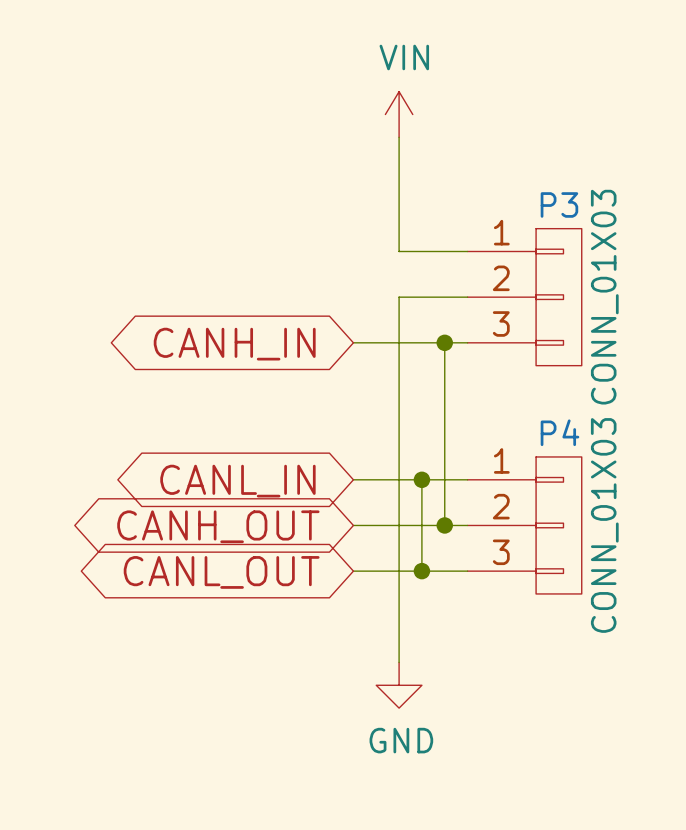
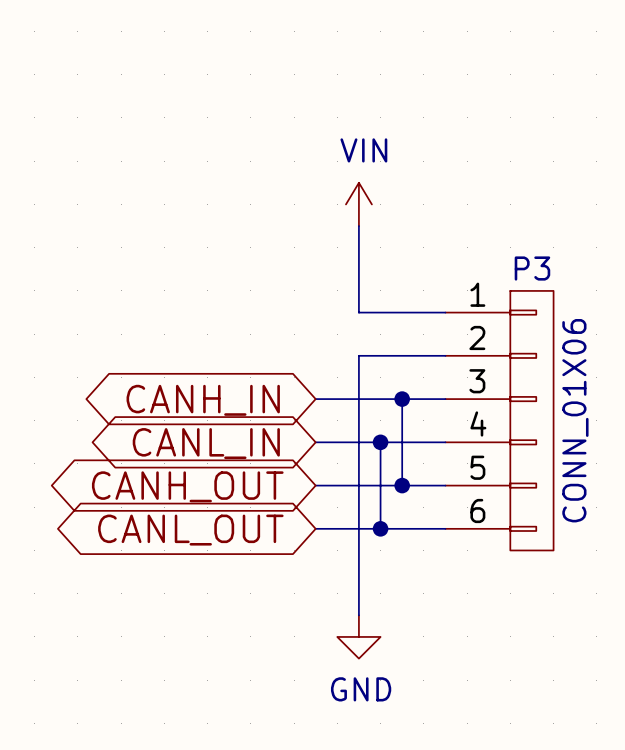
power symbol position: VIN (399, 114) -> VIN (358, 204)
wire: (399, 137) (399, 251) (467, 251) -> none
P3 name position: P3 (559, 204) -> P3 (532, 268)
P3 symbol: [467, 228, 582, 366] -> [445, 290, 554, 551]
wire: (399, 297) (467, 297) -> (358, 269) (358, 226)
P3 value: CONN_01X03 (604, 297) -> CONN_01X06 (575, 420)
wire: (353, 342) (399, 342) (399, 388) -> (445, 355) (358, 355)
wire: (444, 342) (444, 434) -> none
junction position: (444, 342) -> (402, 399)
global label position: CANH_IN (234, 344) -> CANH_IN (203, 400)
wire: none -> (315, 399) (445, 399)
P4: CONN_01X03 (524, 525) -> none

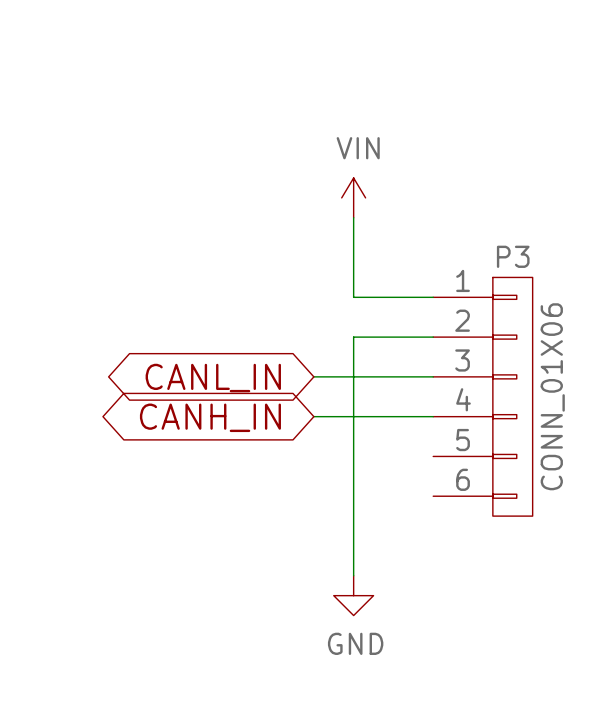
wire: (402, 399) (402, 485) -> none
junction: (402, 399) -> none
global label: CANH_IN (203, 400) -> CANL_IN (213, 378)
wire: (380, 442) (380, 528) -> none
junction: (380, 442) -> none
global label: CANL_IN (206, 443) -> CANH_IN (210, 417)
wire: (315, 485) (445, 485) -> none
junction: (402, 485) -> none
global label: CANH_OUT (187, 486) -> none
wire: (315, 528) (445, 528) -> none
junction: (380, 528) -> none
global label: CANL_OUT (190, 530) -> none

